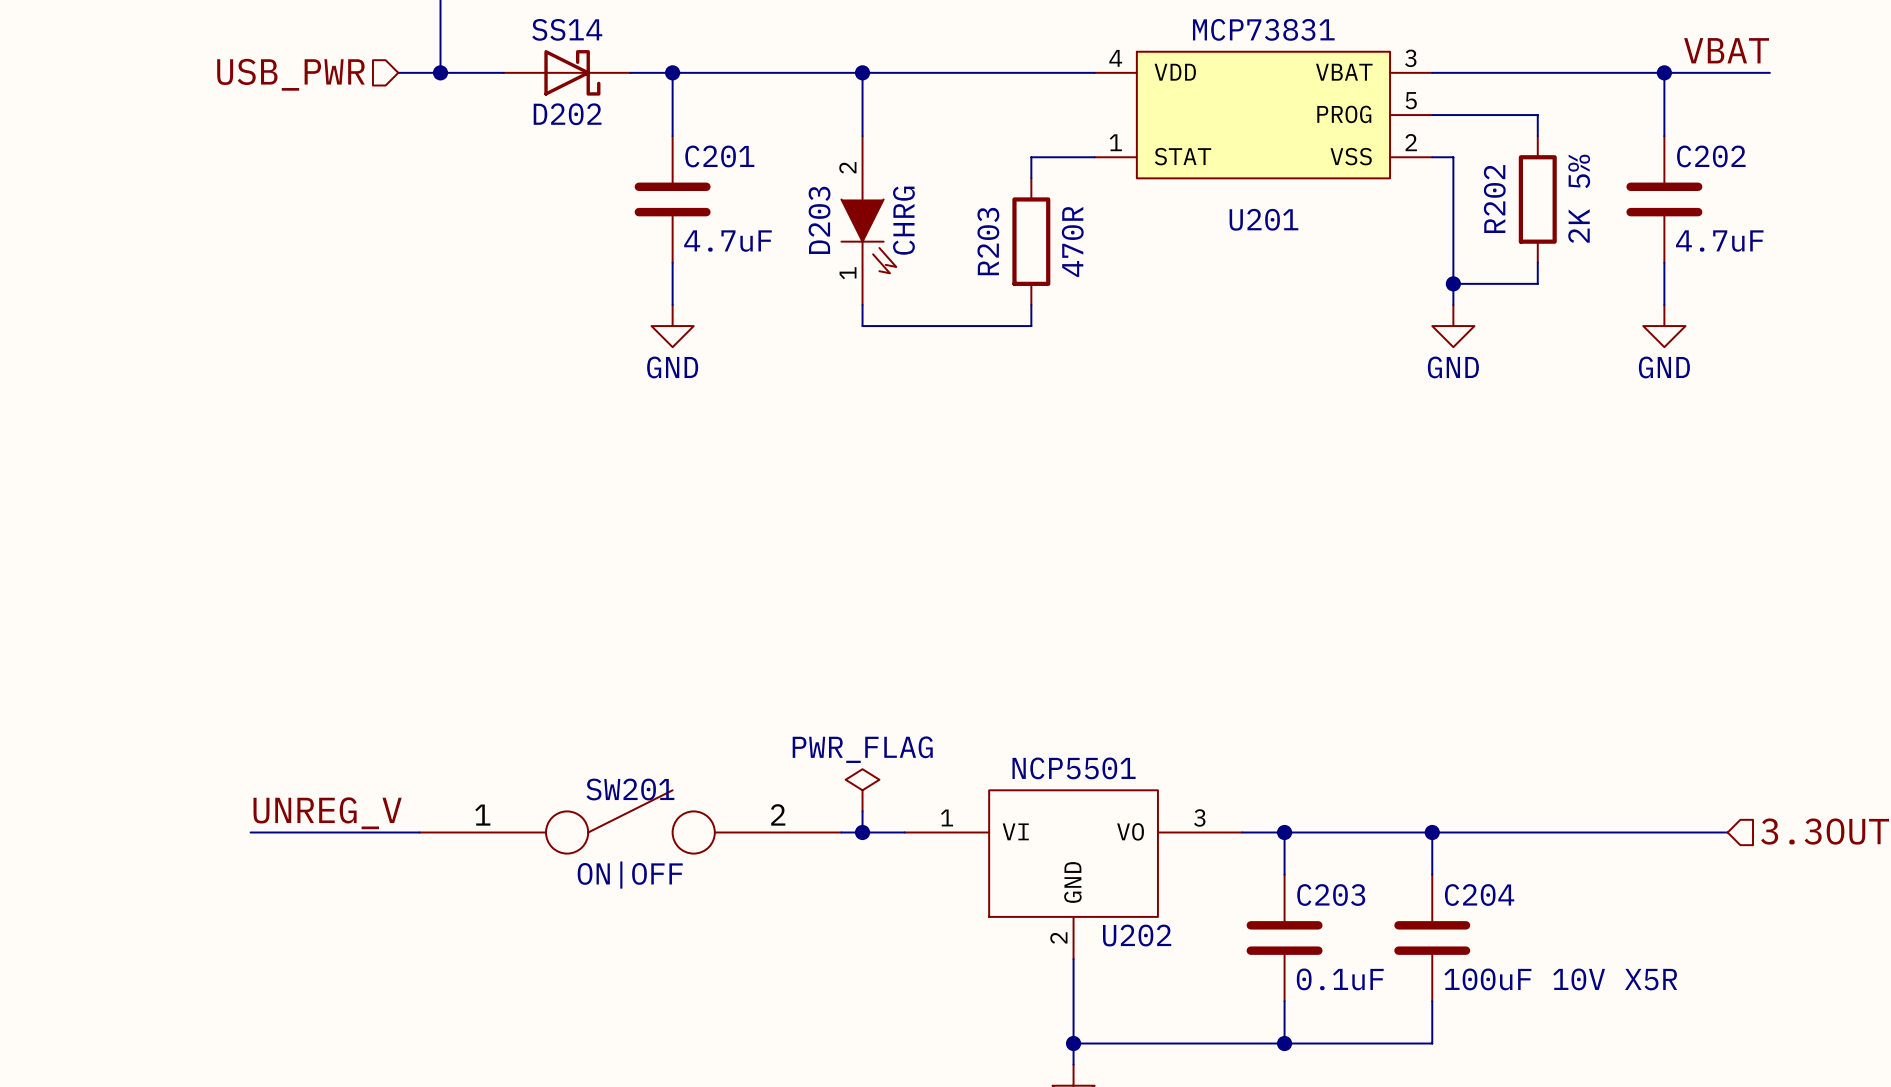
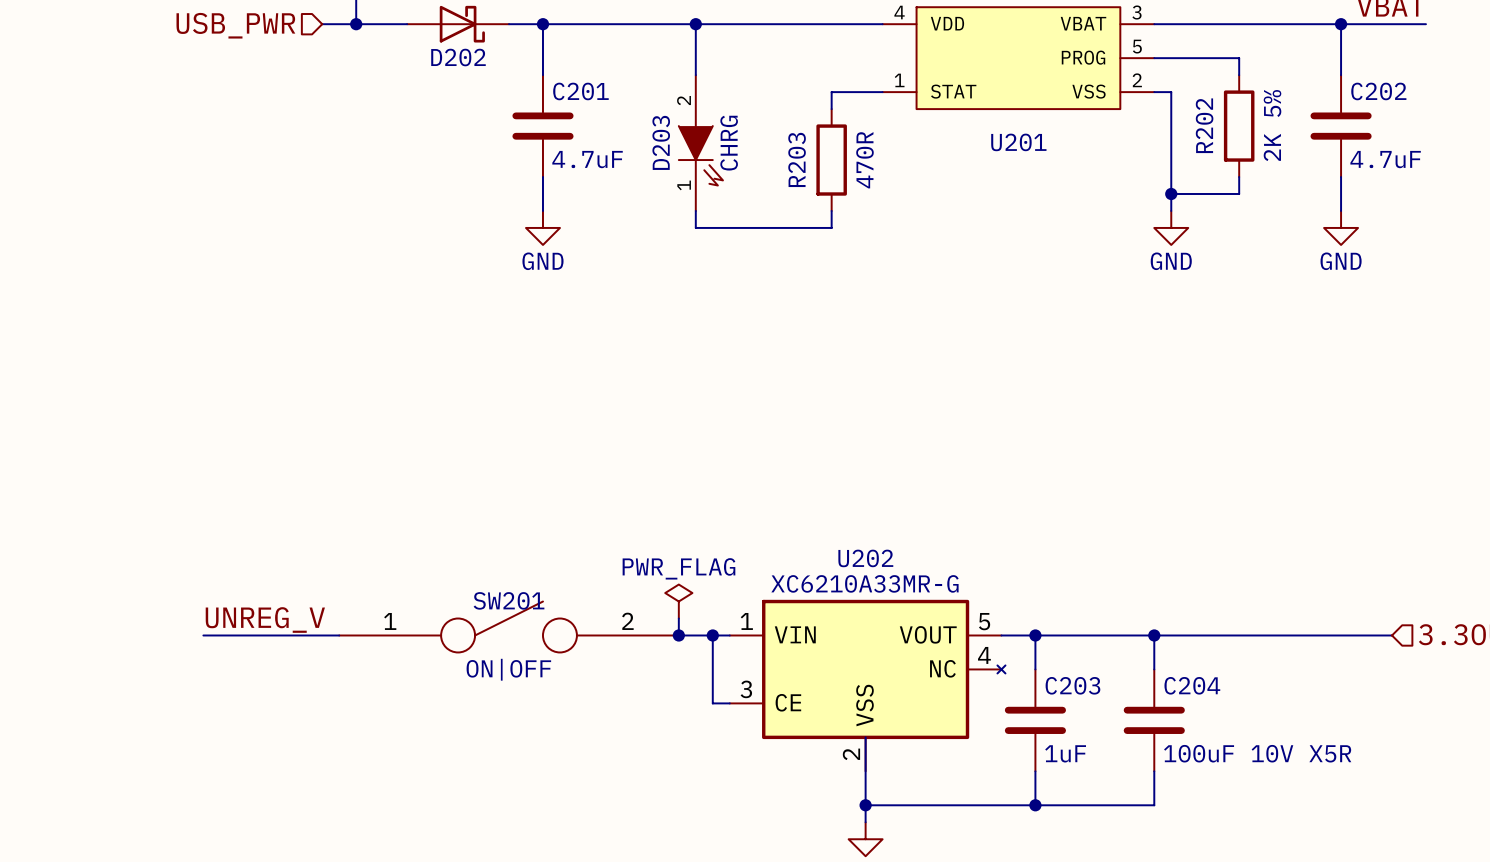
U202 value: NCP5501 (1074, 768) -> XC6210A33MR-G (864, 583)
power symbol position: PWR_FLAG (862, 790) -> PWR_FLAG (678, 601)
U202 symbol: [904, 790, 1243, 960] -> [729, 599, 1006, 772]
wire: (862, 811) (862, 832) -> (678, 618) (678, 635)
junction: none -> (678, 635)
junction: (862, 832) -> none
wire: none -> (712, 635) (712, 703) (729, 703)
junction: none -> (712, 635)
U202 name position: U202 (1137, 935) -> U202 (865, 558)
C203 value: 0.1uF (1340, 979) -> 1uF (1065, 753)

